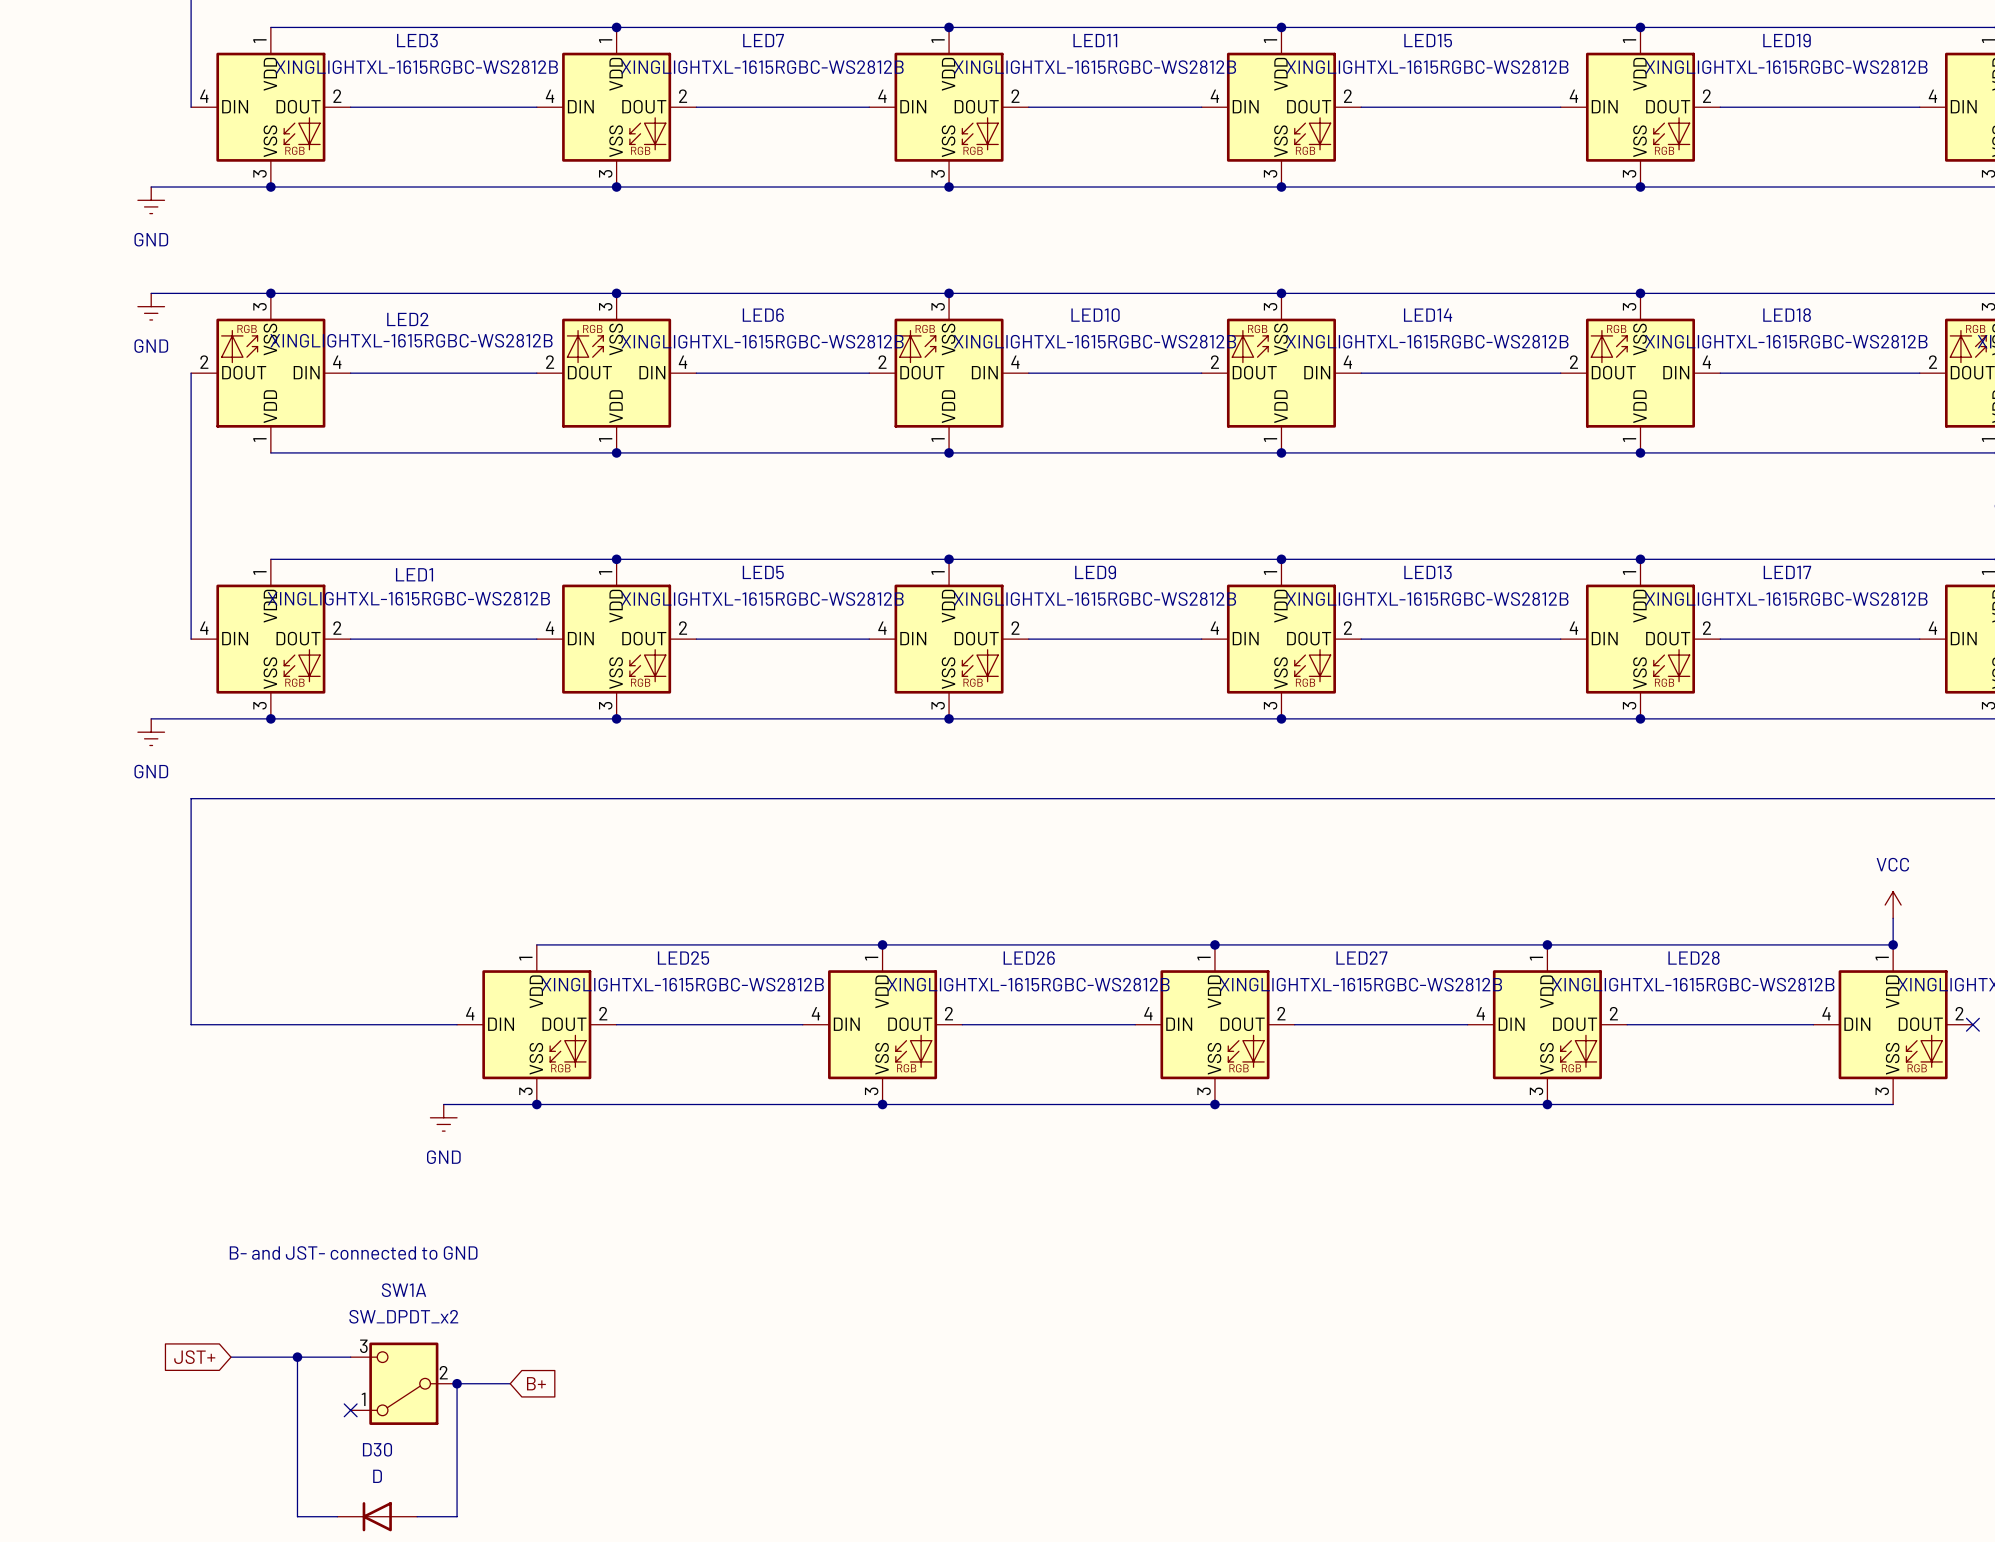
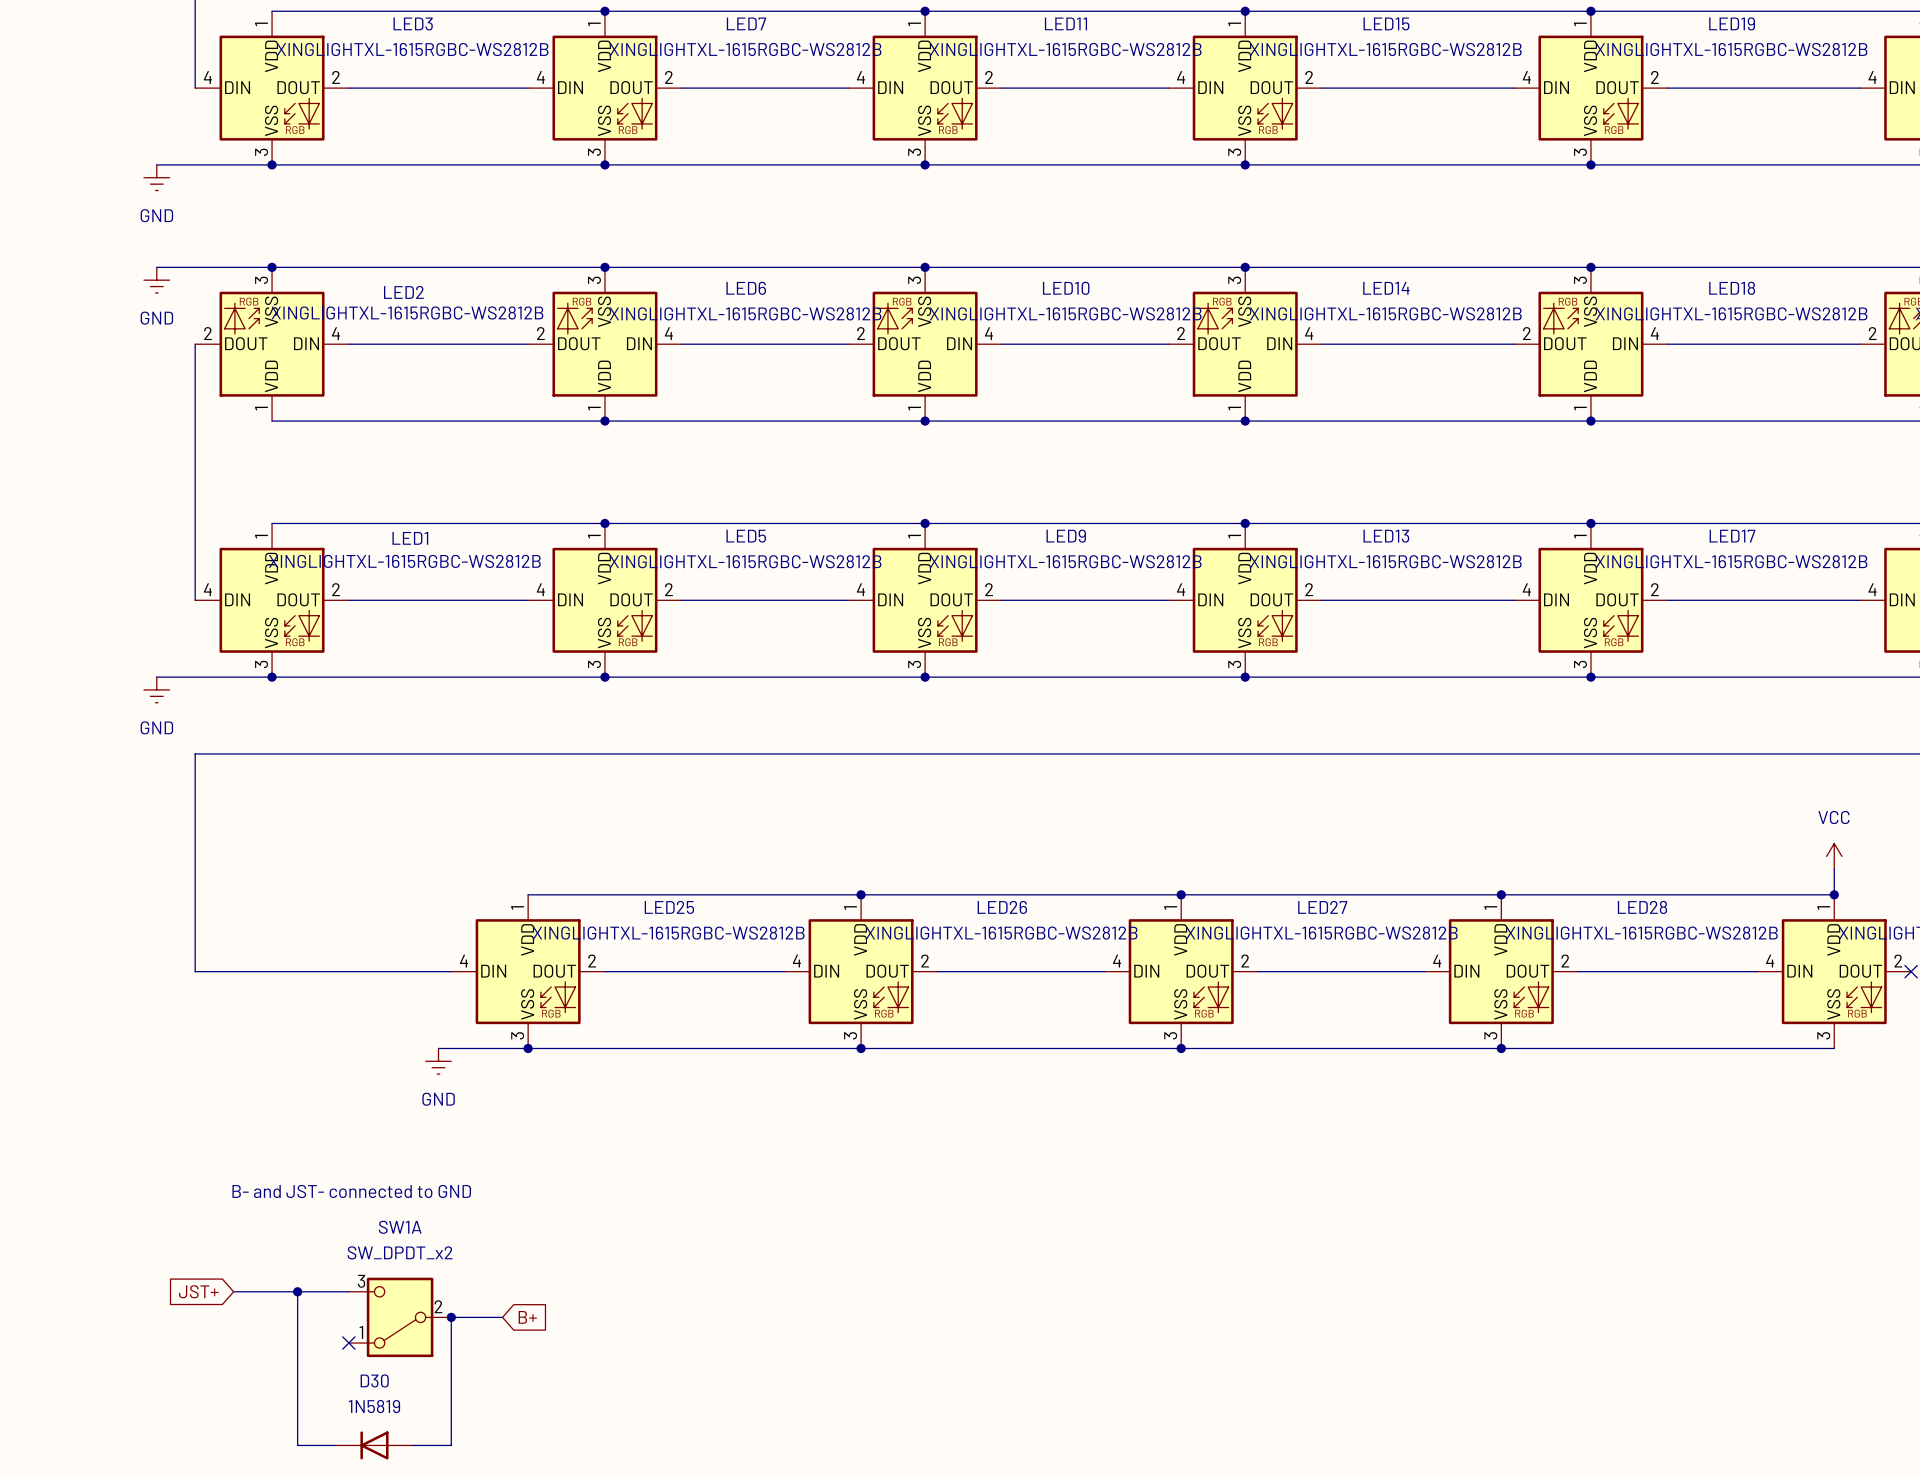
D30 value: D (377, 1476) -> 1N5819 (374, 1406)

